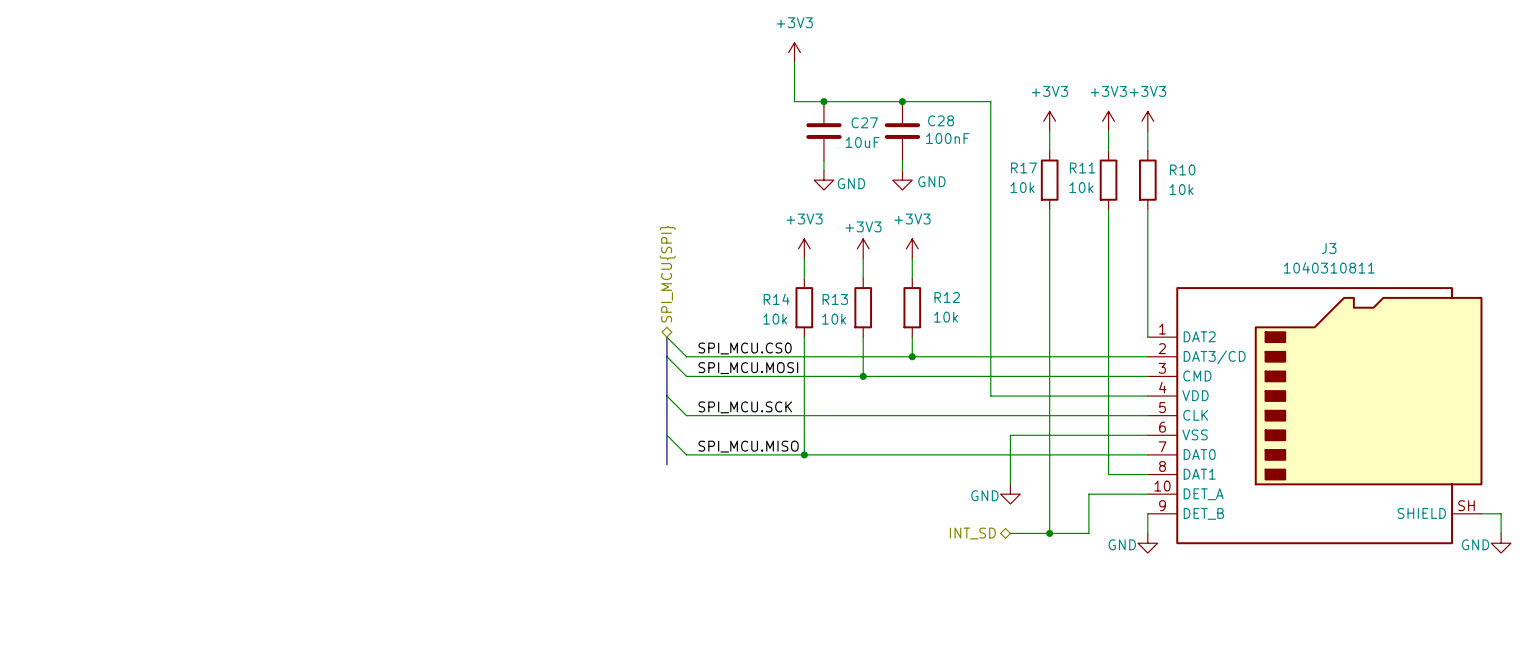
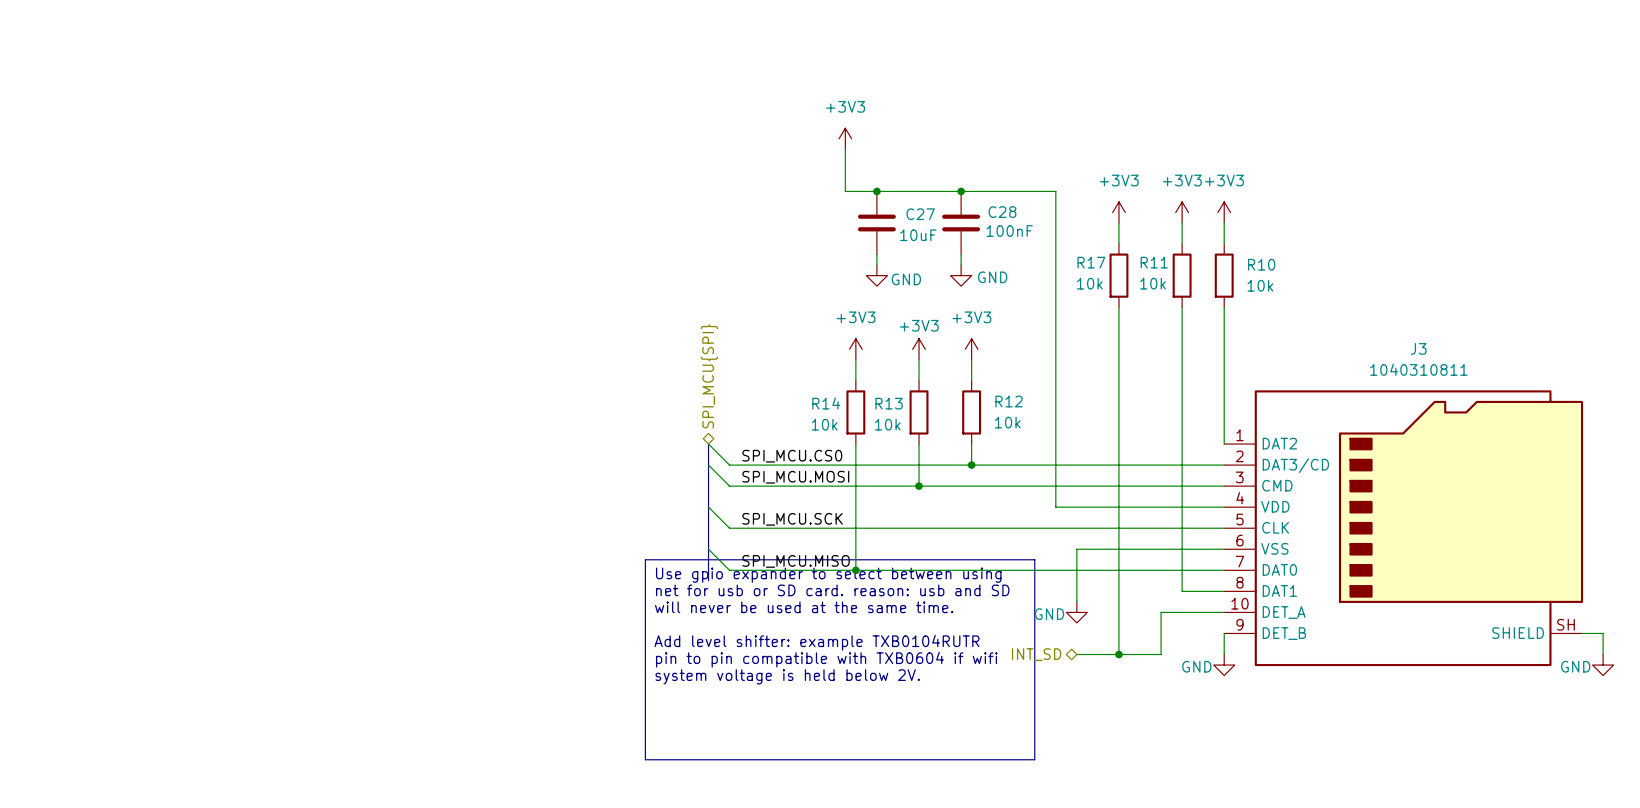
line: none -> (645, 559) (1034, 559) (1034, 759) (645, 759) (645, 559)
text: none -> Use gpio expander to select between using (828, 575)
text: none -> net for usb or SD card. reason: usb and SD (832, 590)
text: none -> will never be used at the same time. (804, 607)
text: none -> Add level shifter: example TXB0104RUTR (816, 642)
text: none -> pin to pin compatible with TXB0604 if wifi (826, 659)
text: none -> system voltage is held below 2V. (787, 676)

